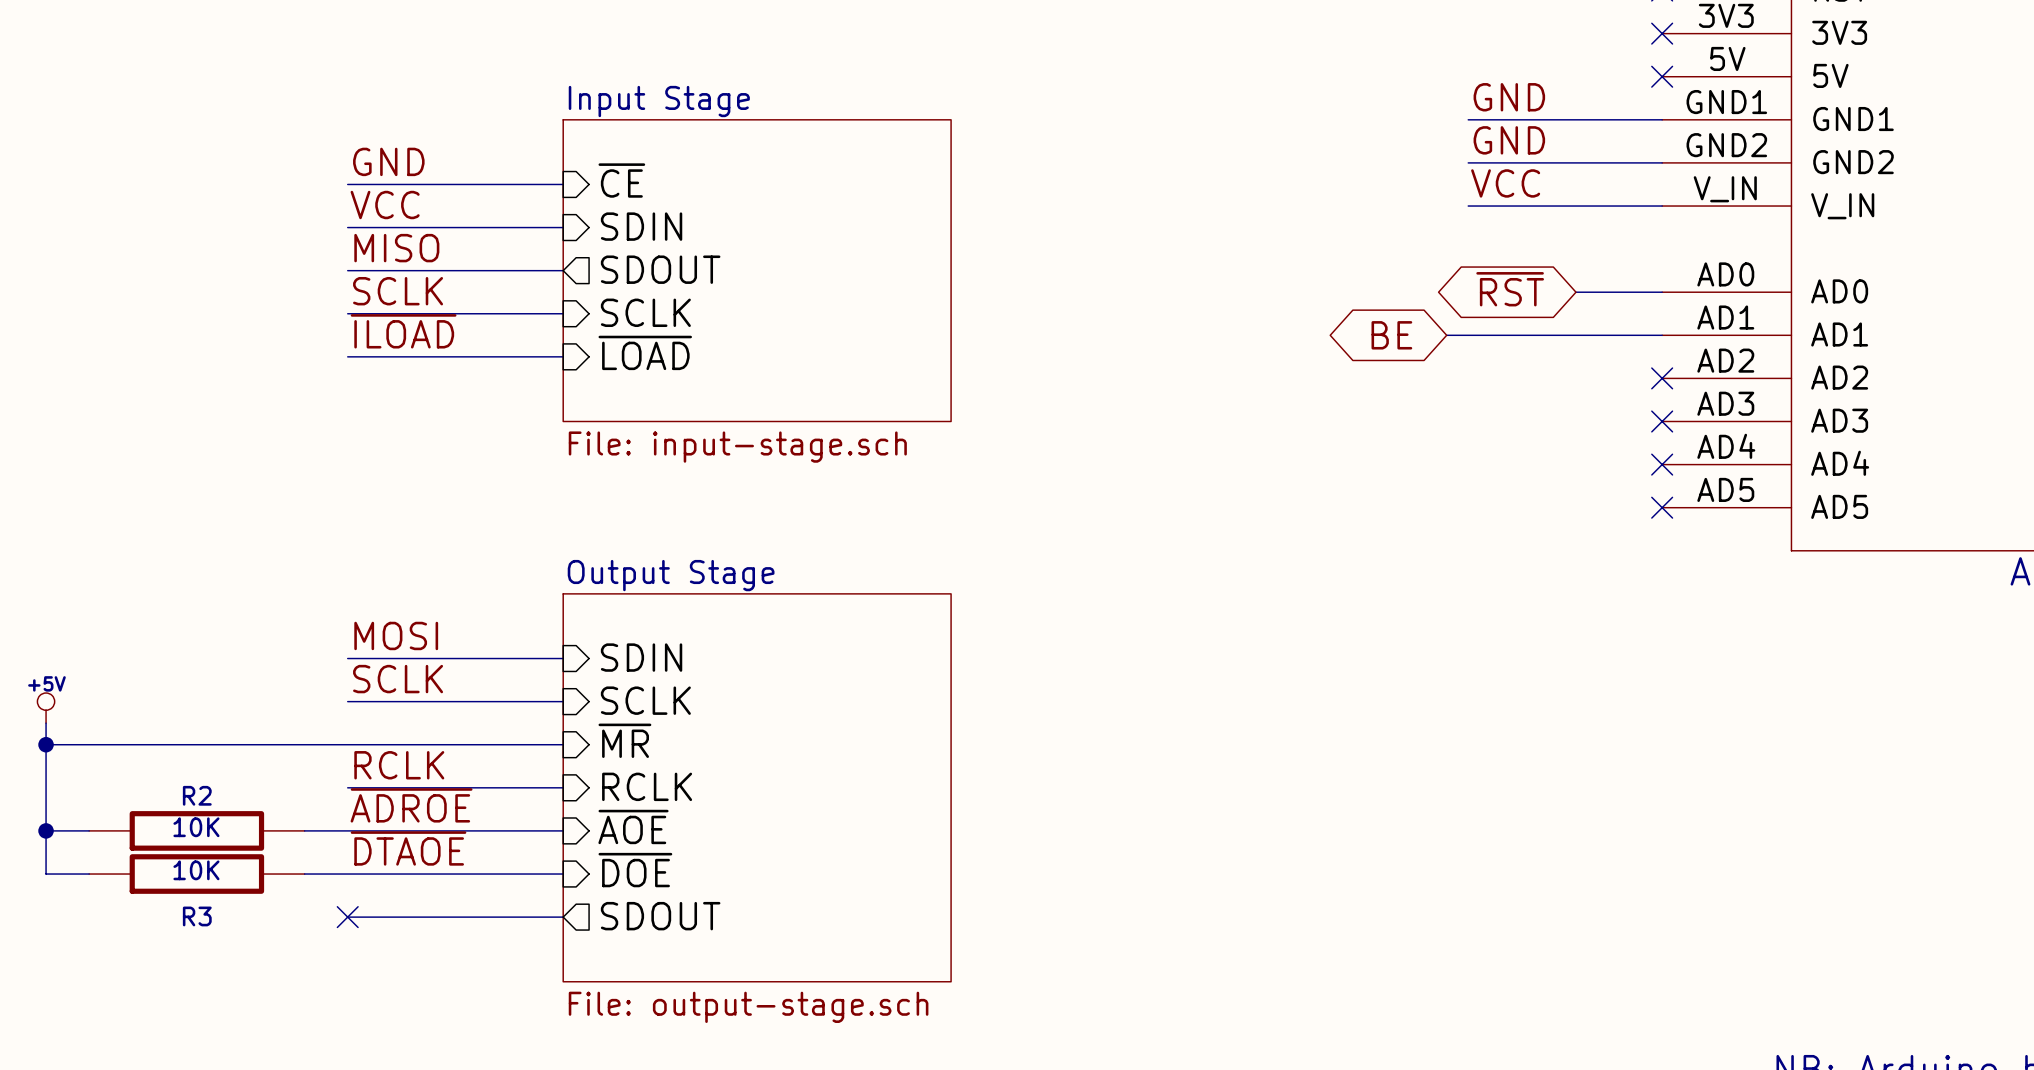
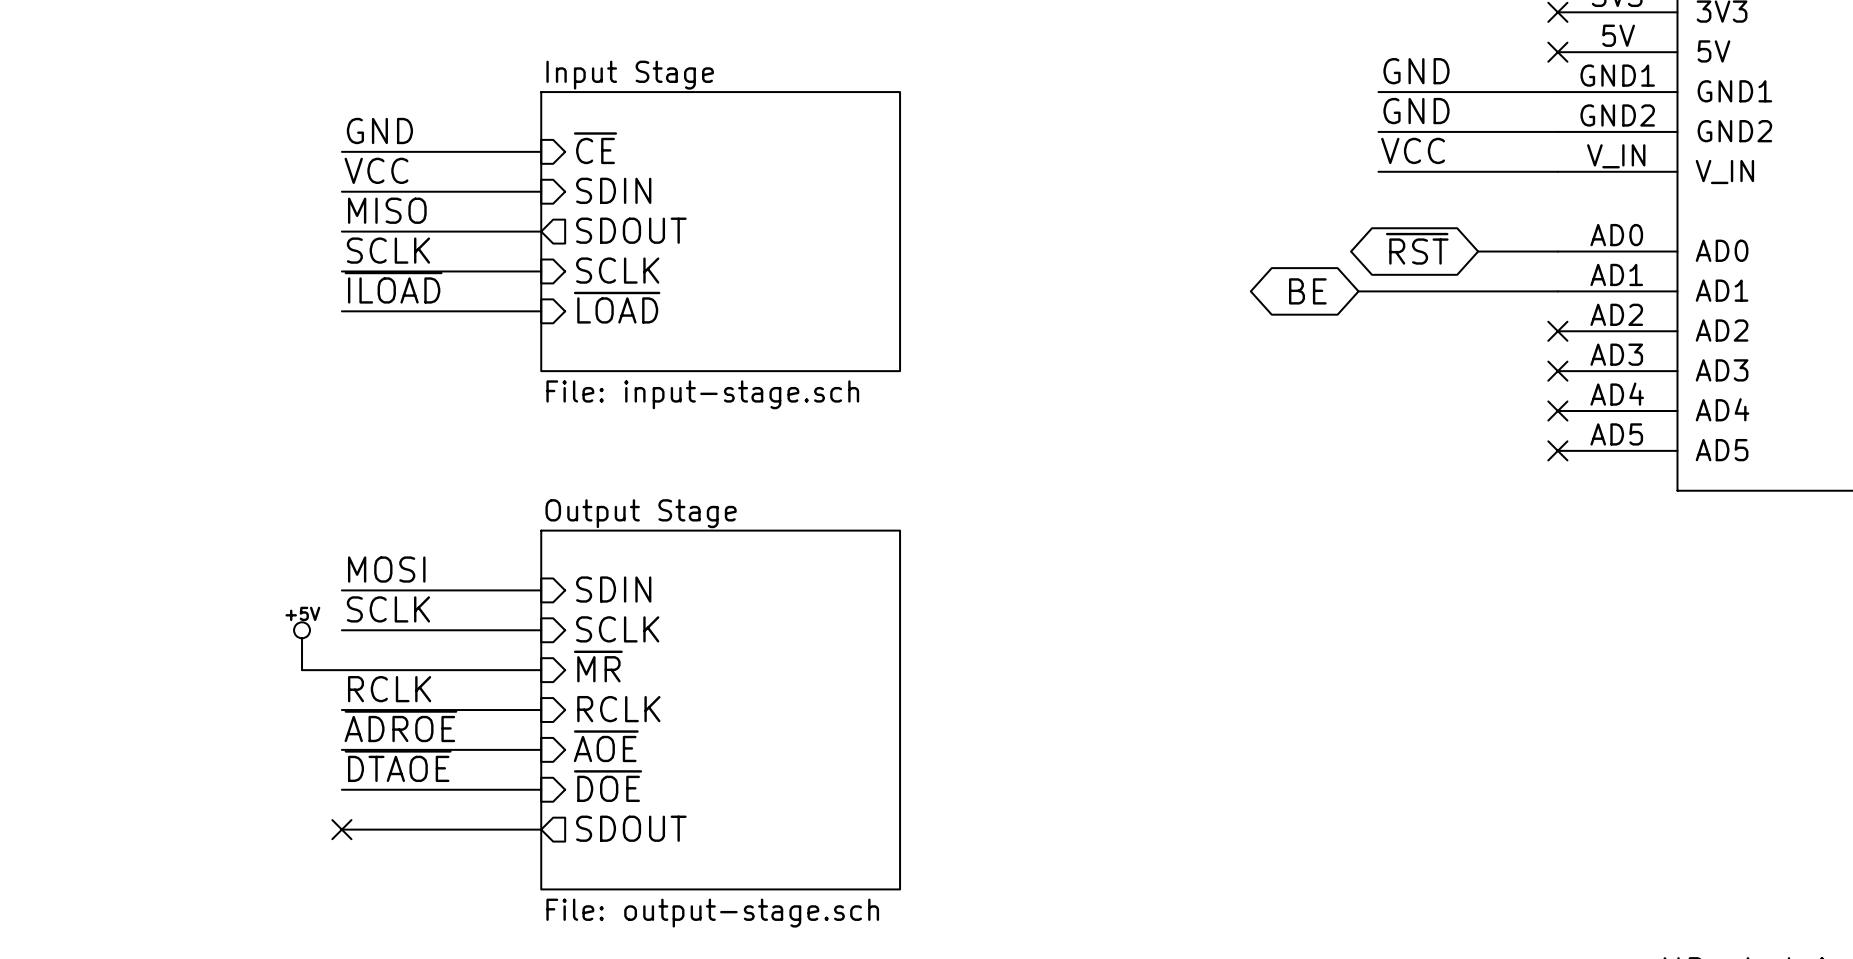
power symbol position: +5V (46, 708) -> +5V (302, 636)
wire: (46, 723) (46, 874) (89, 874) -> none
wire: (46, 744) (304, 744) -> (302, 650) (302, 670)
junction: (46, 744) -> none
wire: (46, 830) (89, 830) -> none
junction: (46, 830) -> none
R2: 10K (196, 830) -> none
wire: (304, 830) (347, 830) -> none
R3: 10K (196, 874) -> none
wire: (304, 874) (347, 874) -> none

